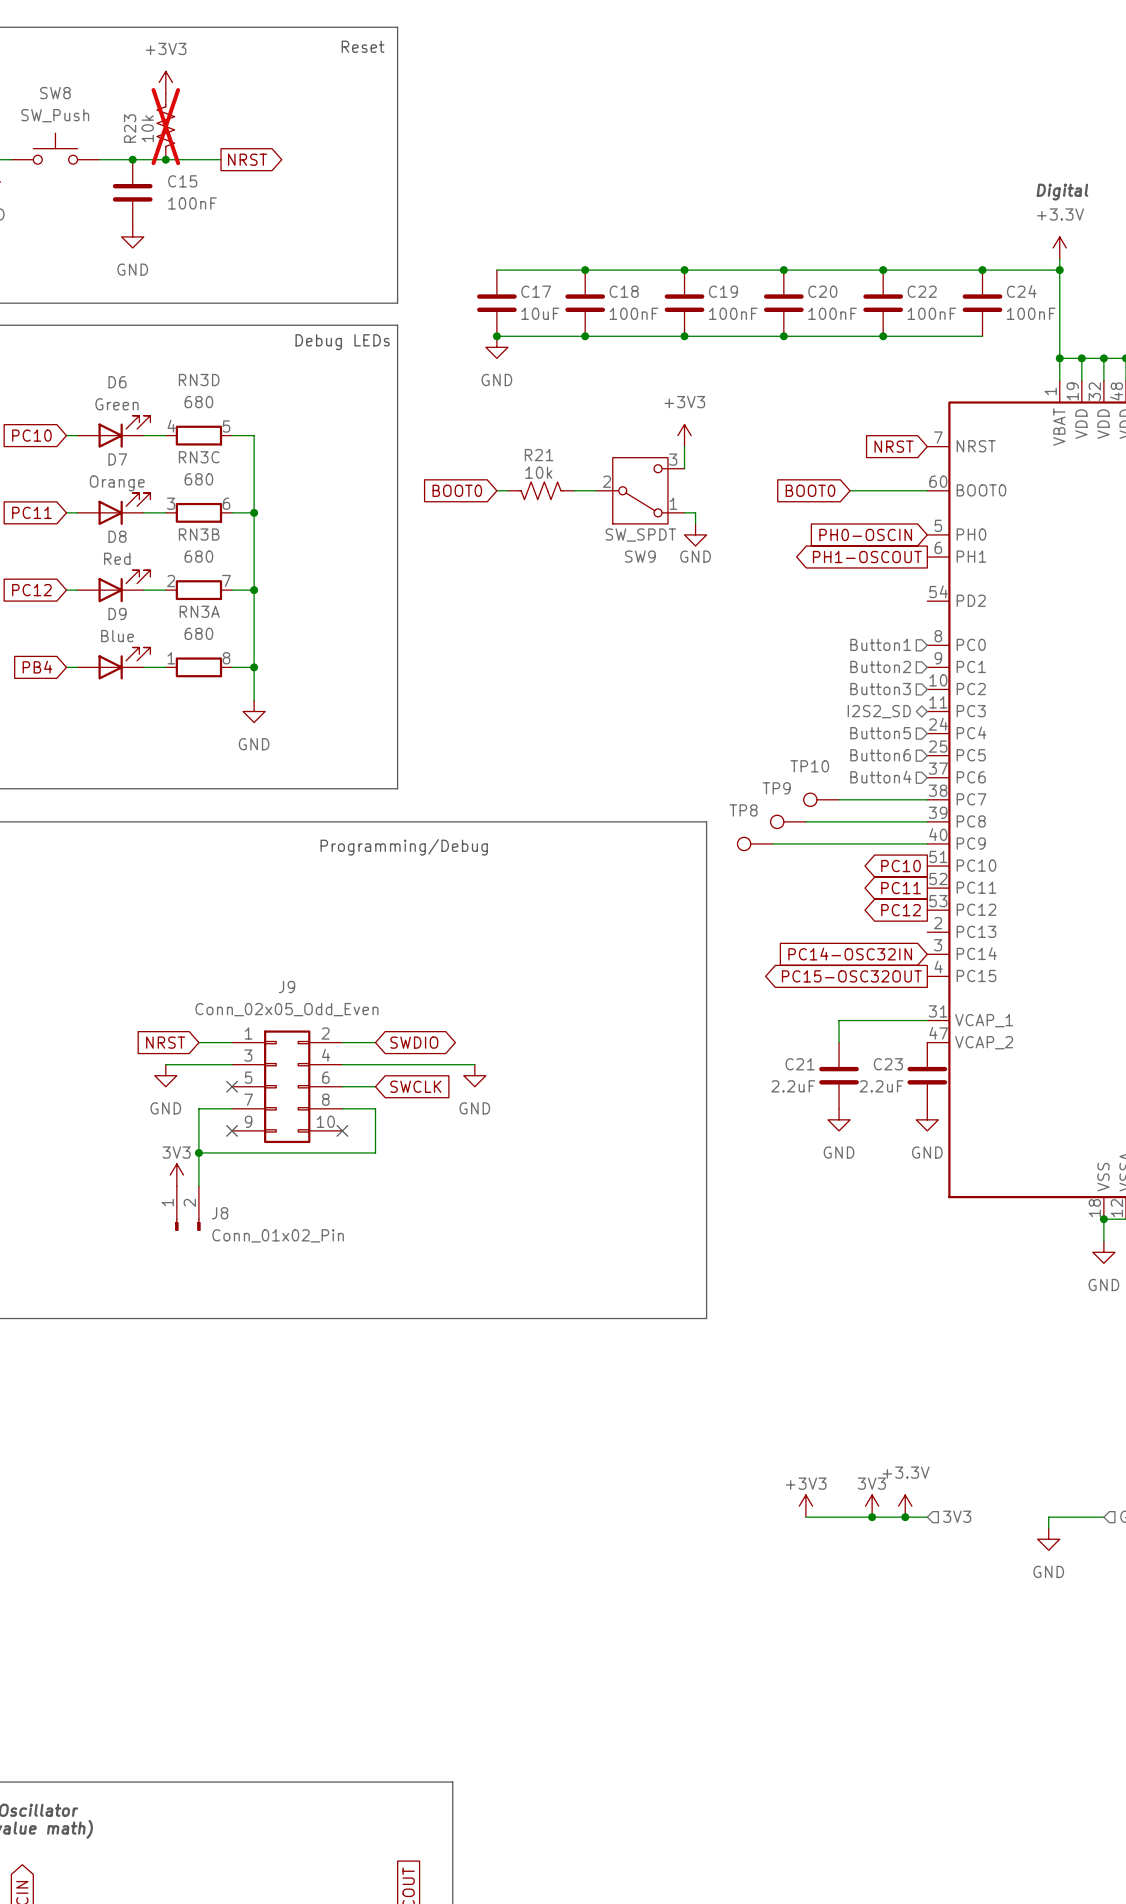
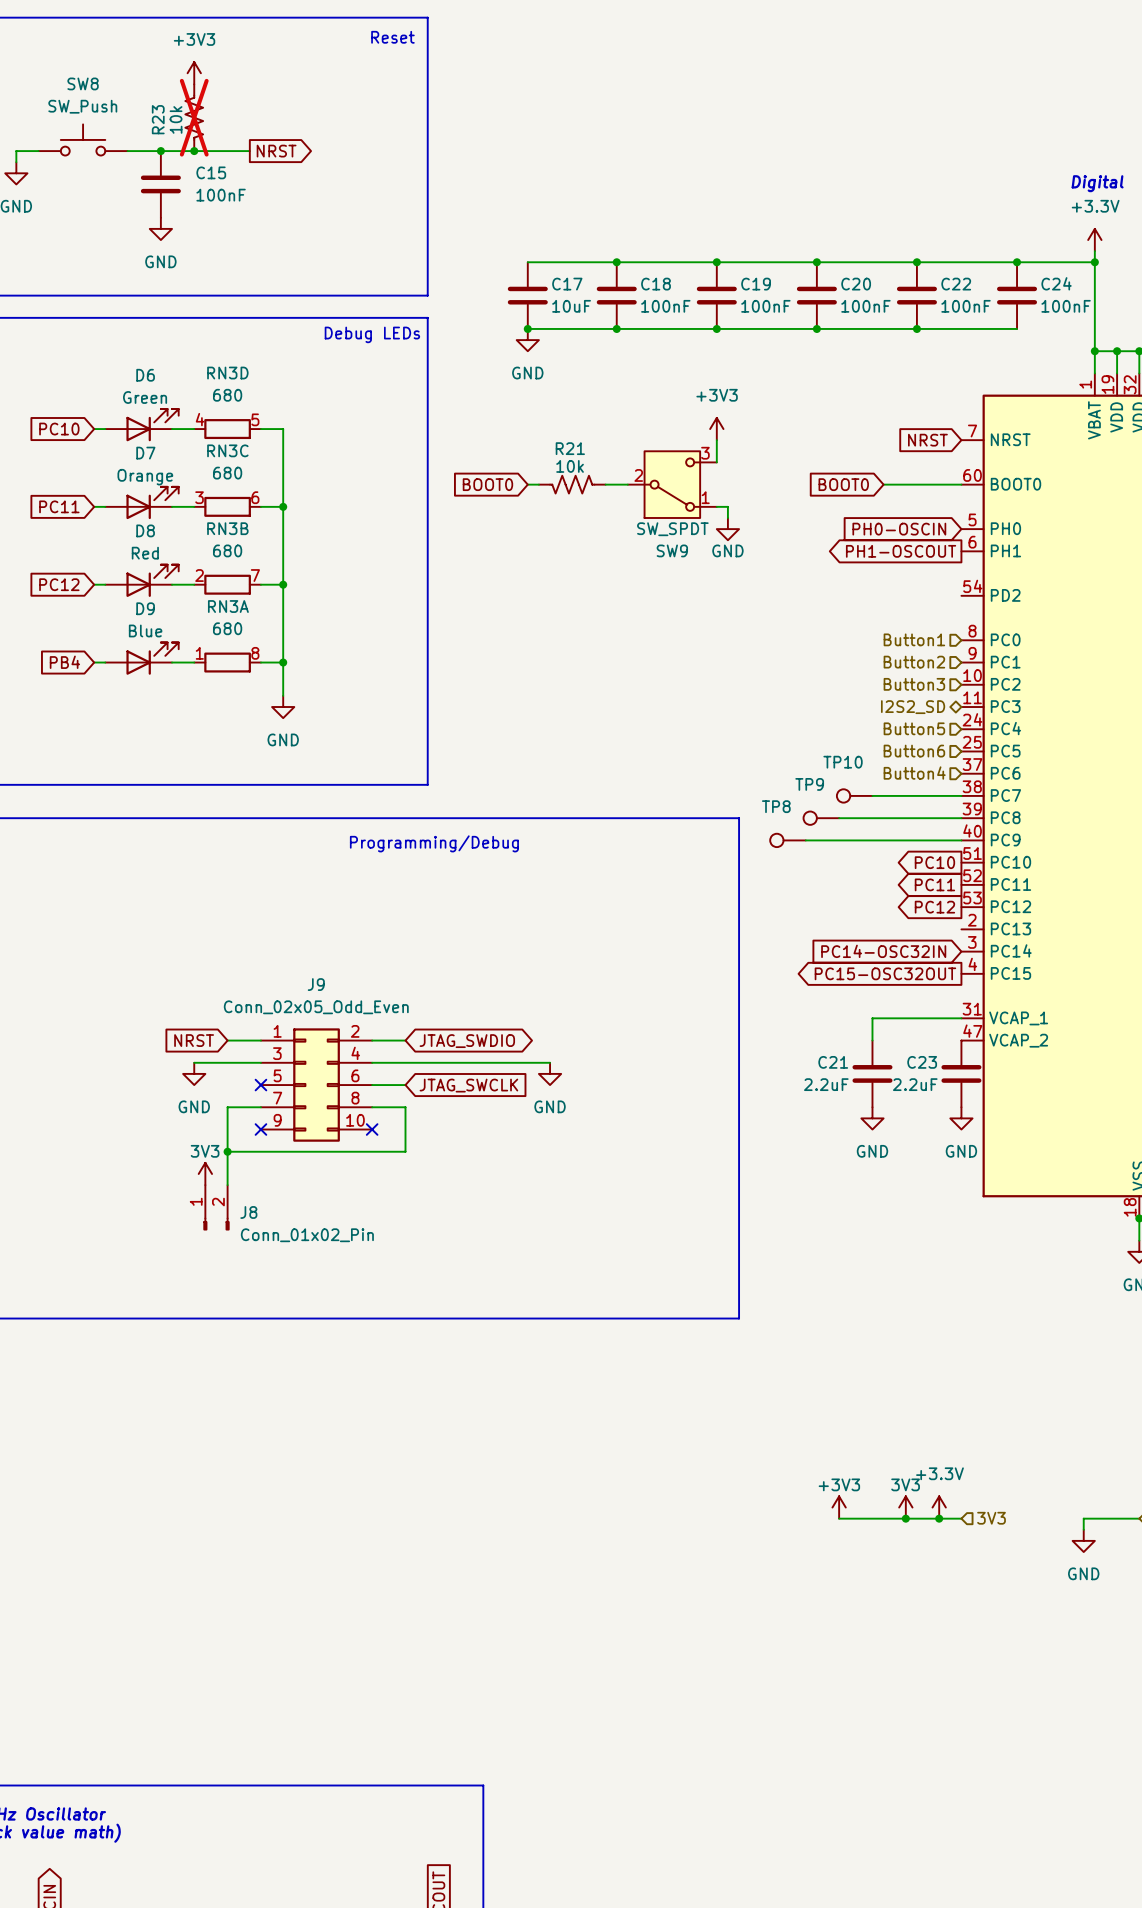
global label: SWDIO (414, 1042) -> JTAG_SWDIO (467, 1041)
wire: none -> (505, 1062) (550, 1062)
power symbol position: GND (474, 1075) -> GND (550, 1073)
global label: SWCLK (415, 1086) -> JTAG_SWCLK (468, 1085)

